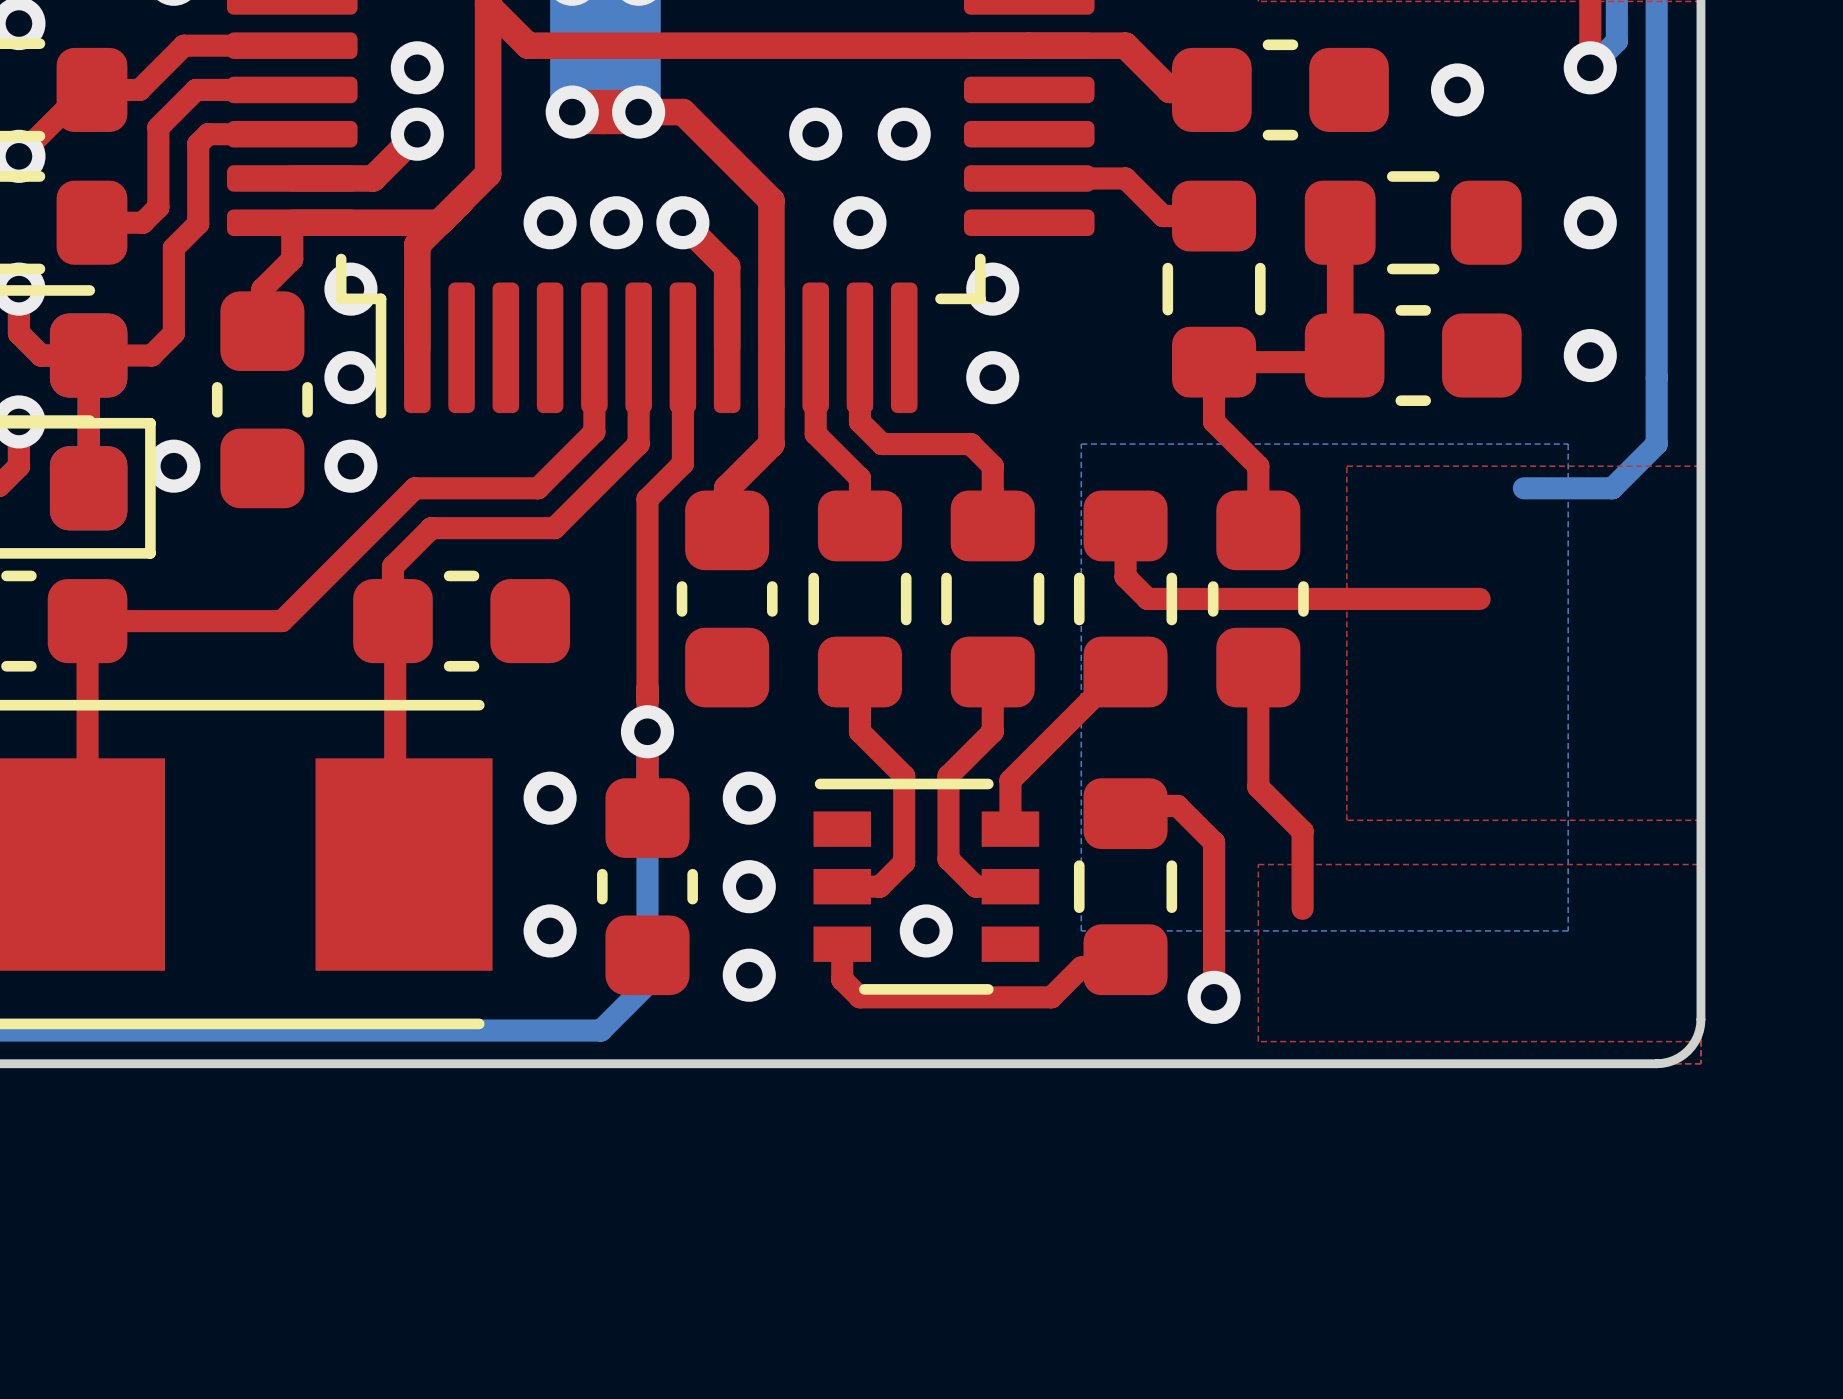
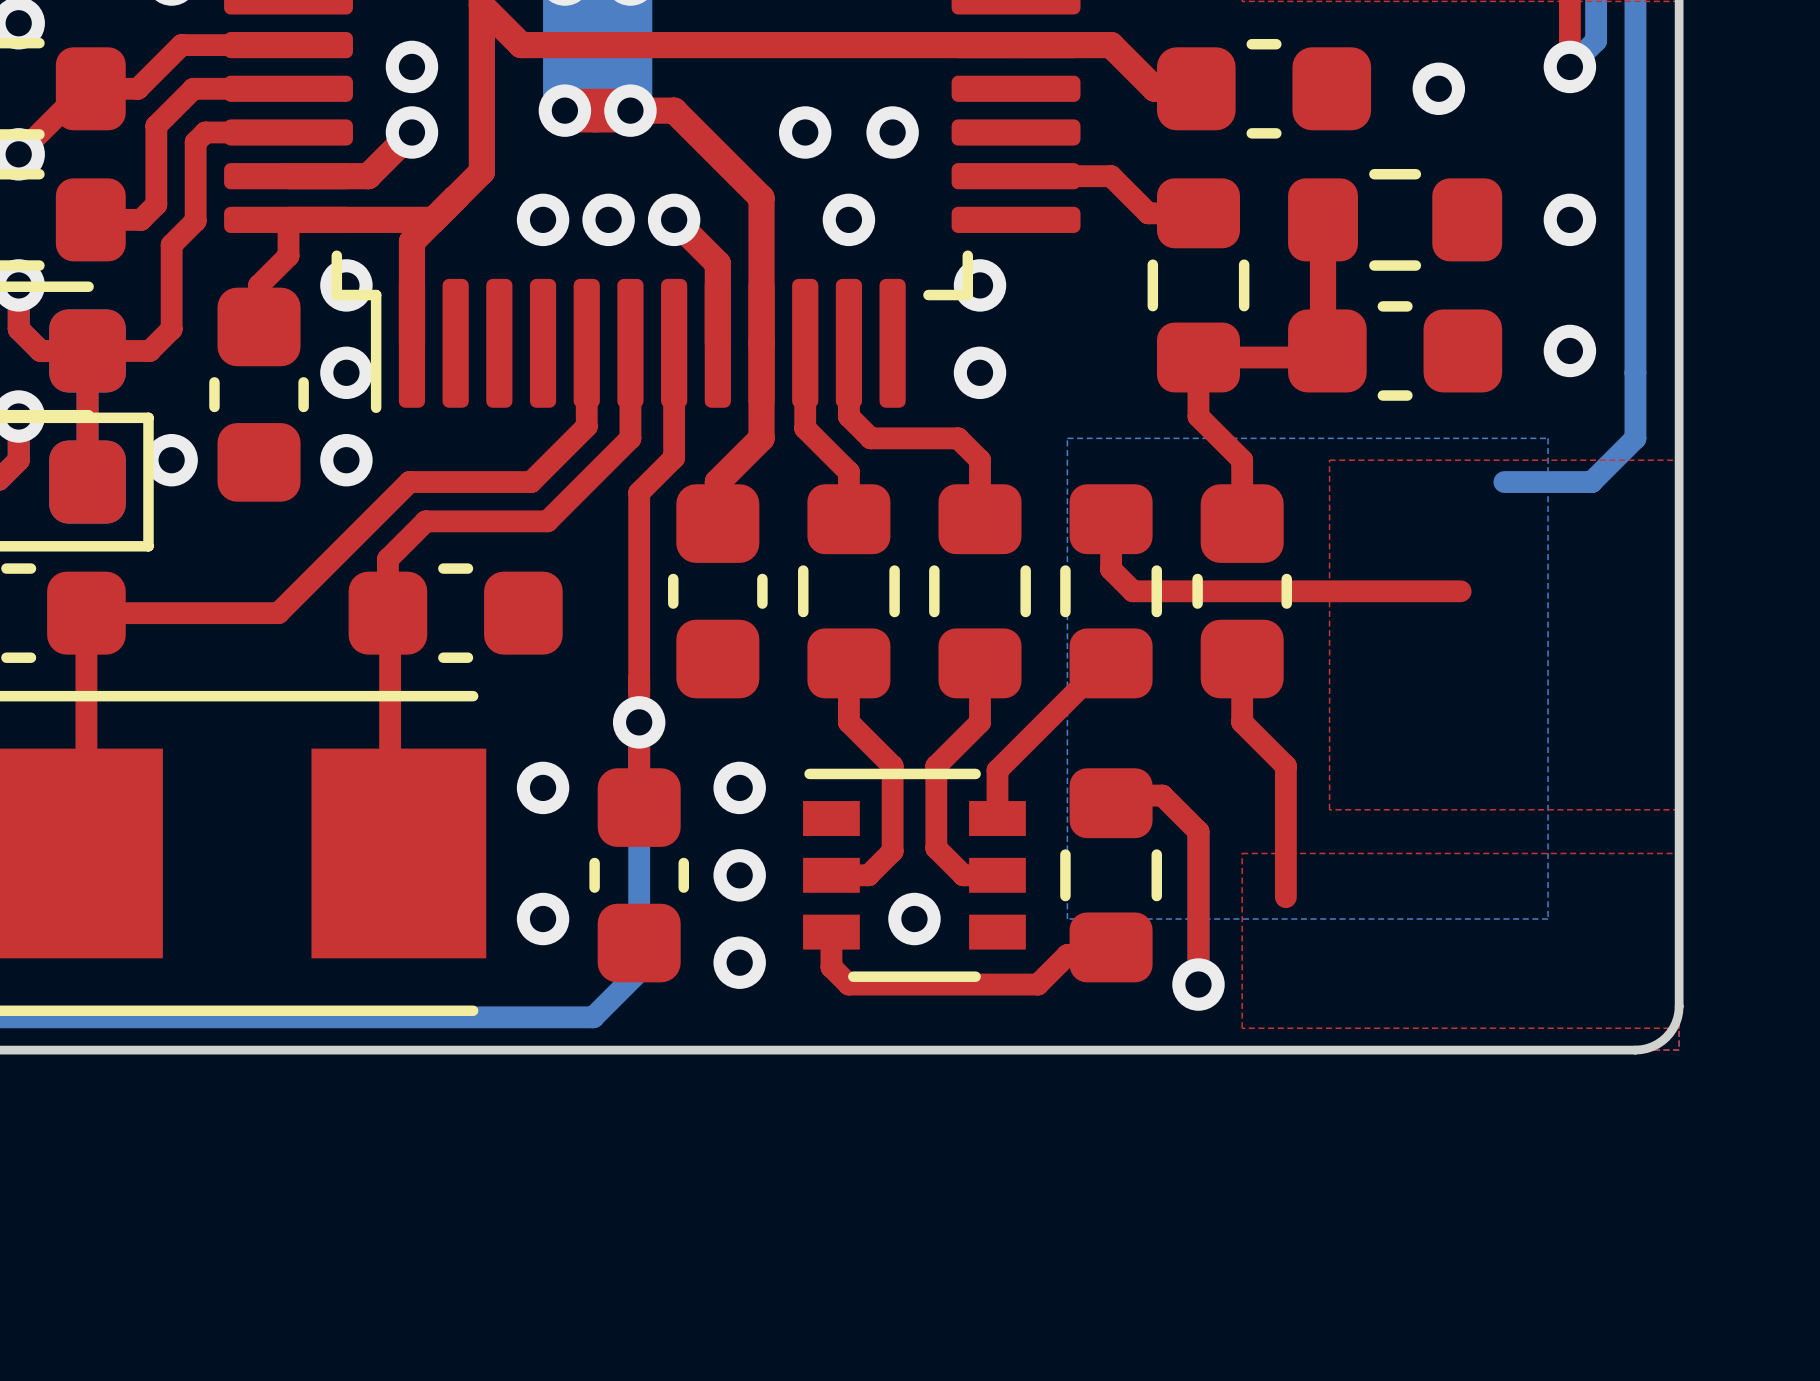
top track: (1258, 731) (1258, 787) (1302, 831) -> (1242, 722) (1285, 766) (1285, 820)

